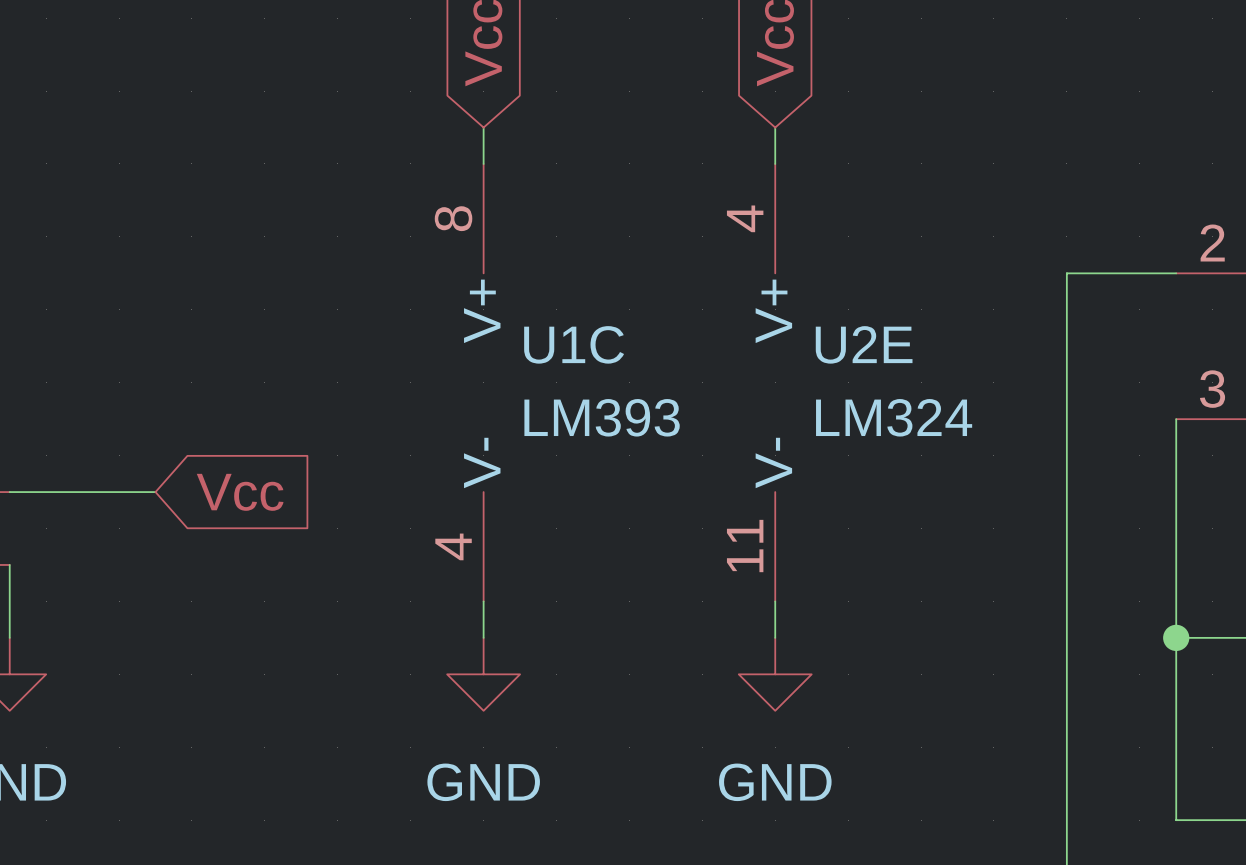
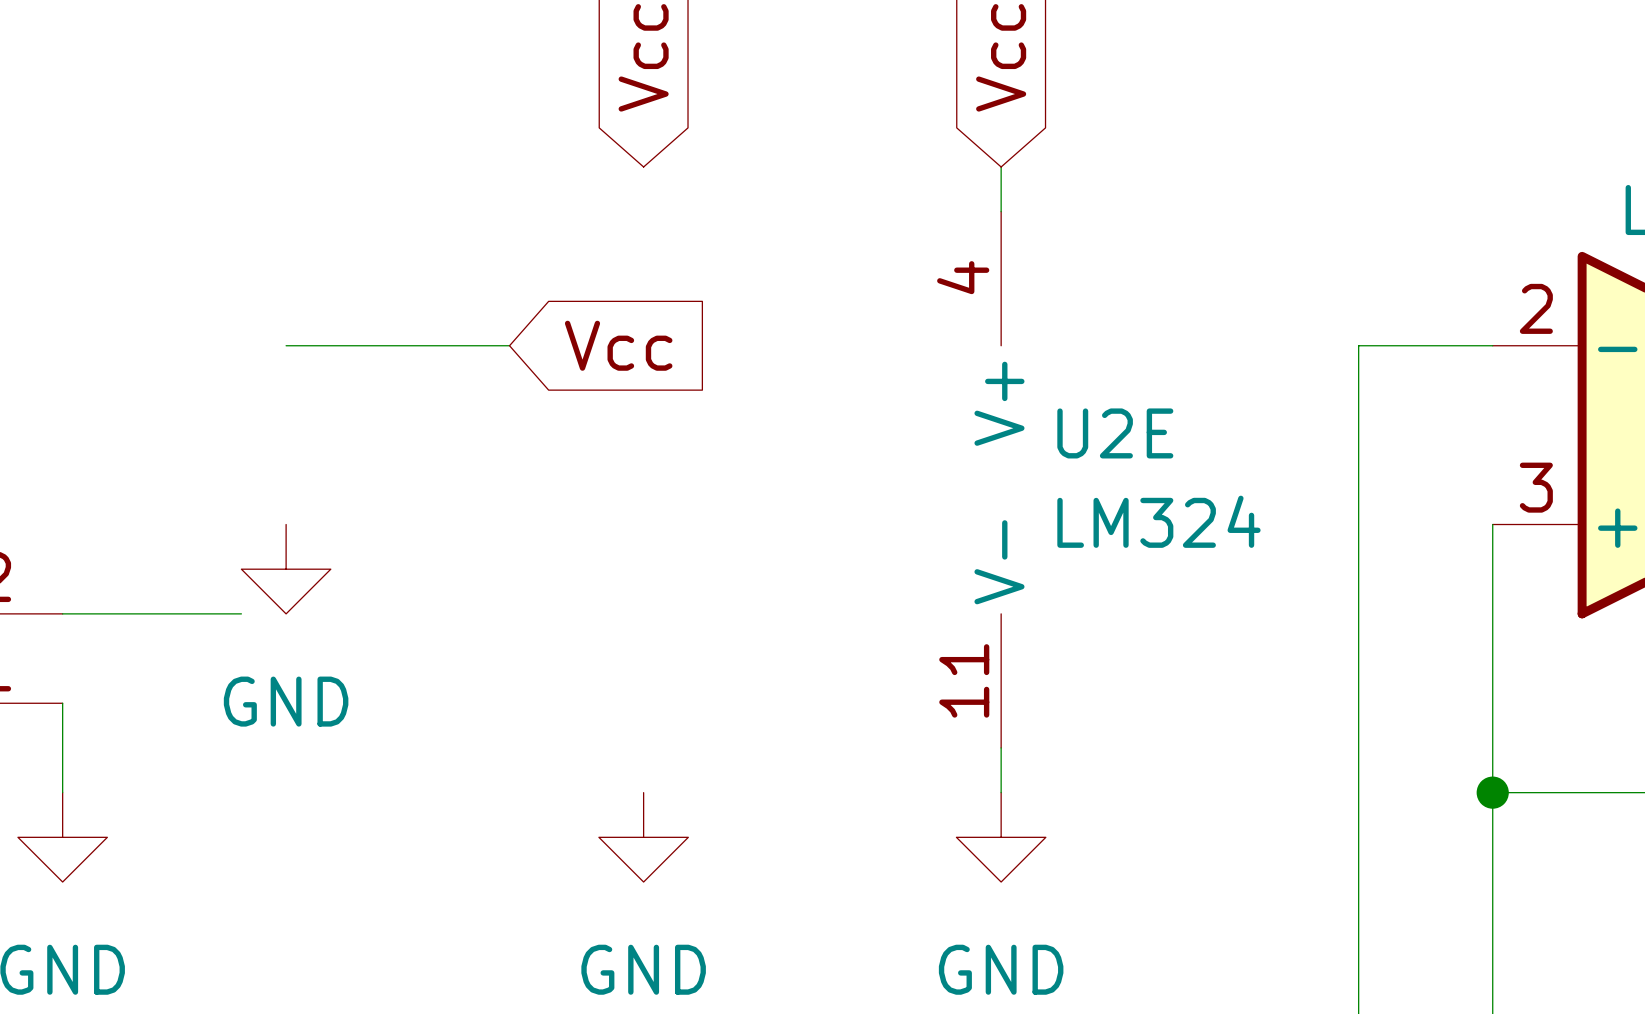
wire: (483, 127) (483, 163) -> none
wire: none -> (286, 345) (509, 345)
U1C: LM393 (483, 382) -> none
power symbol: none -> GND (286, 569)
global label position: Vcc (240, 492) -> Vcc (618, 345)
wire: (483, 601) (483, 637) -> none

